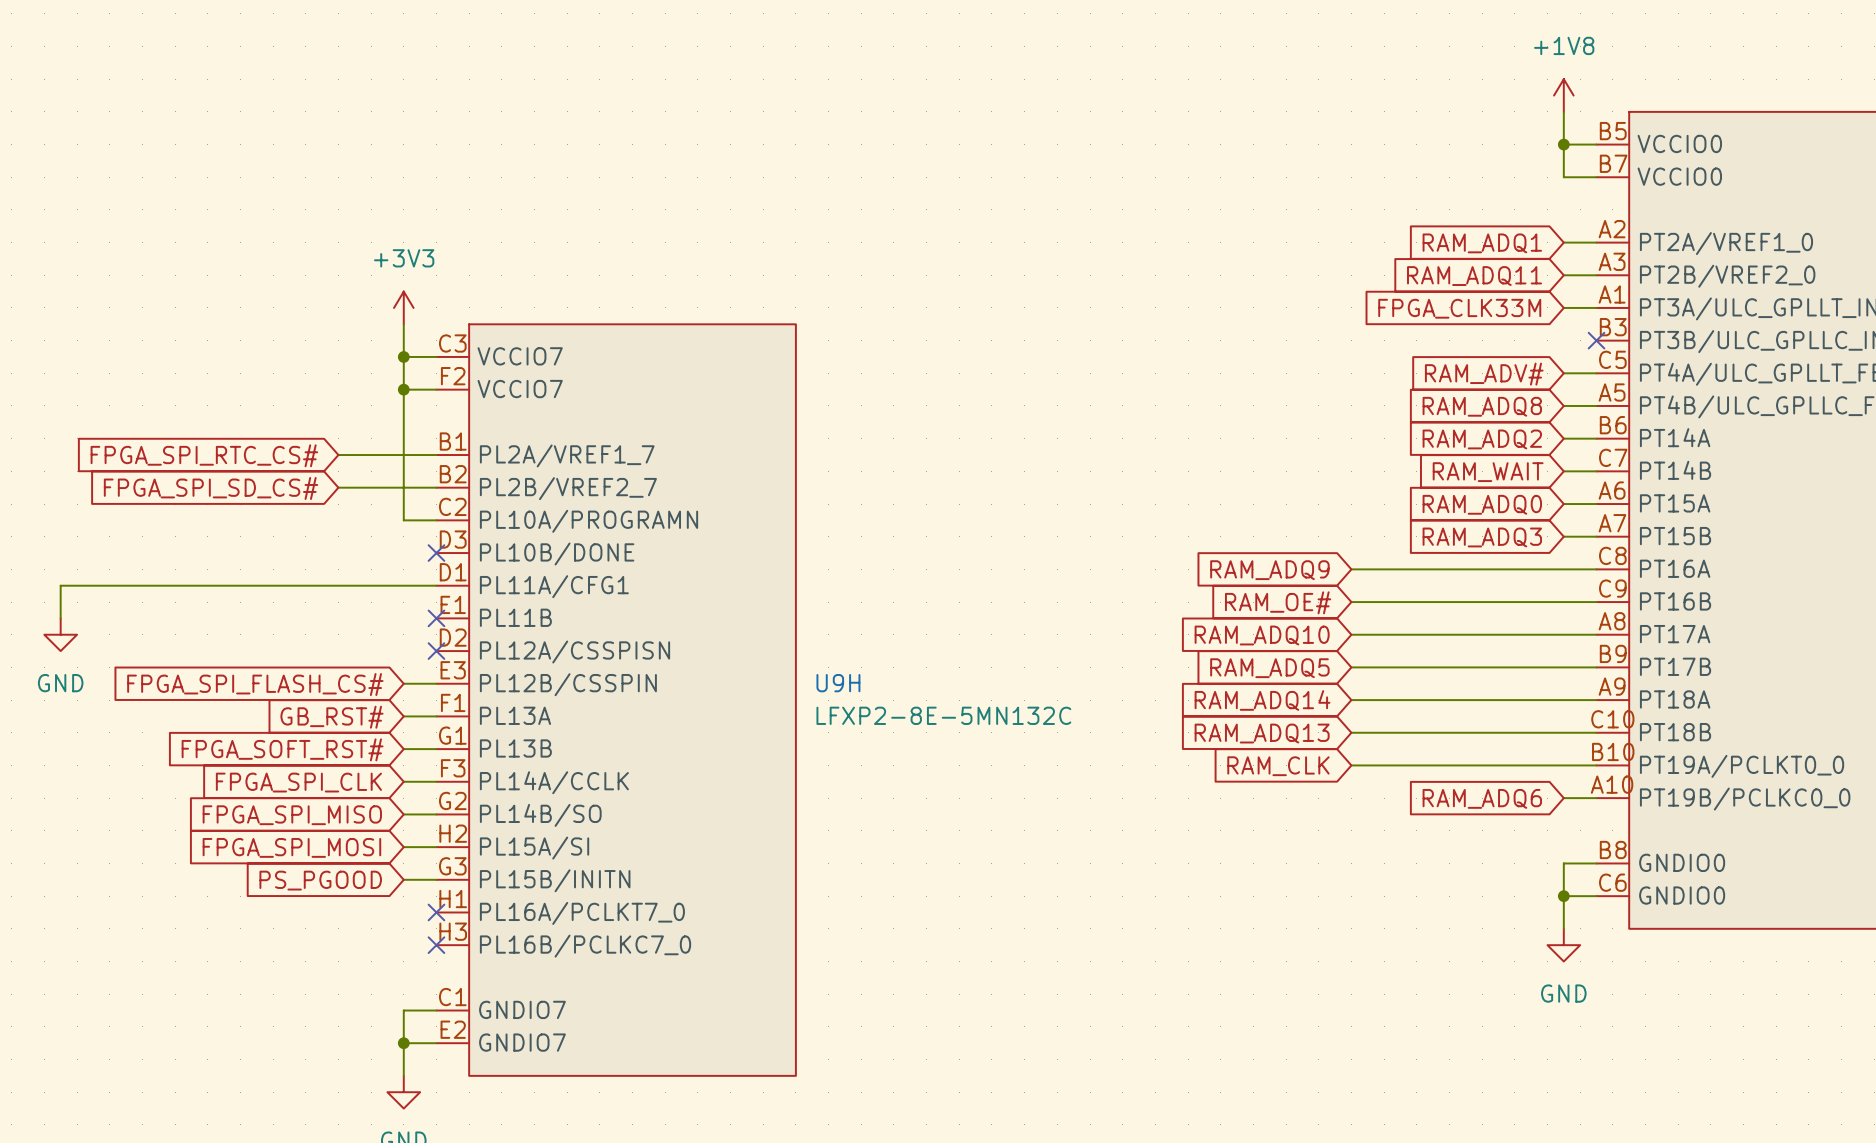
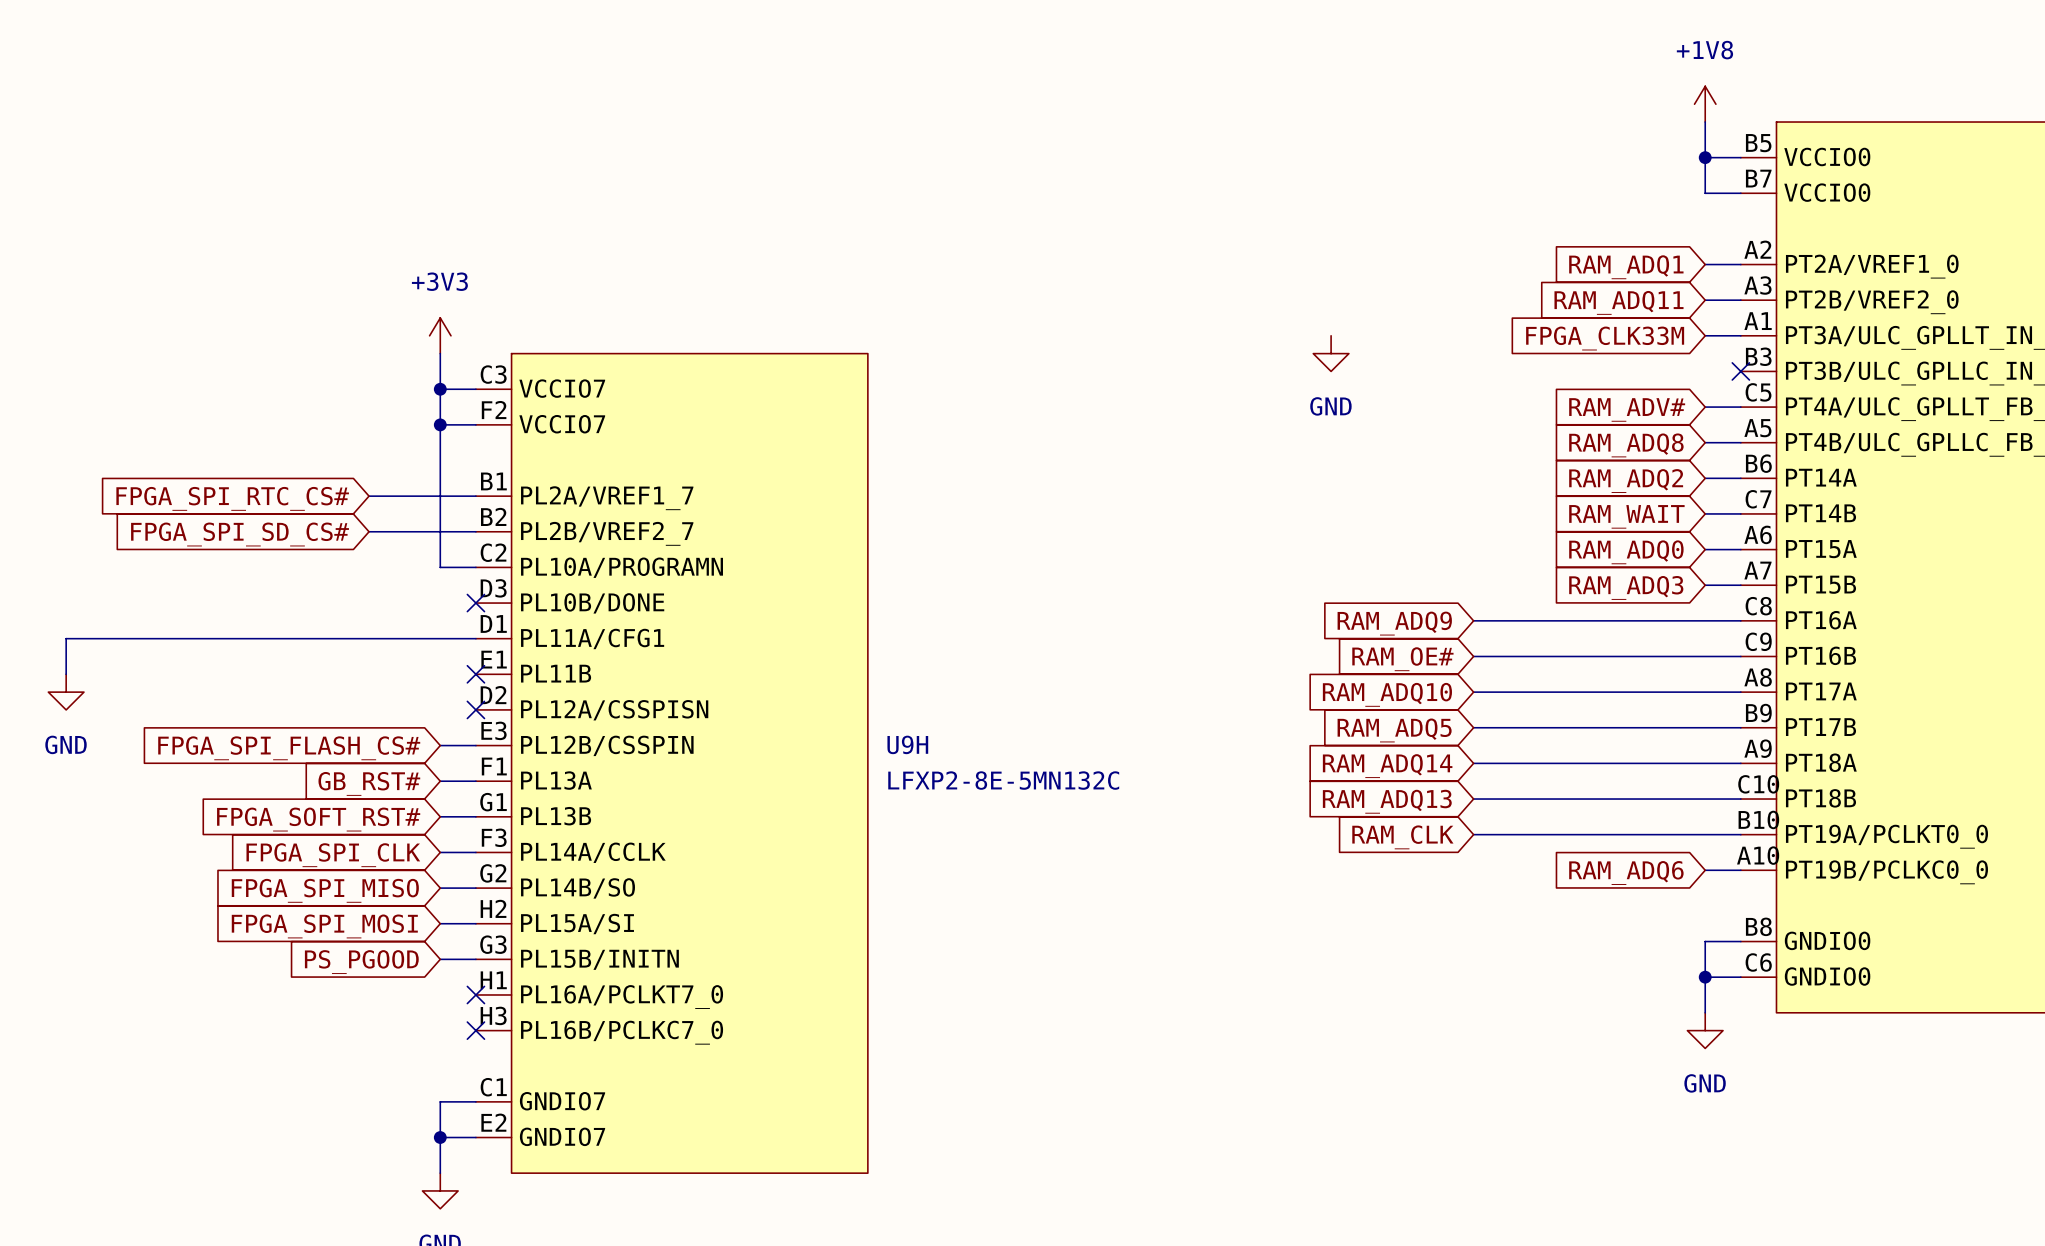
power symbol: none -> GND (1331, 353)

